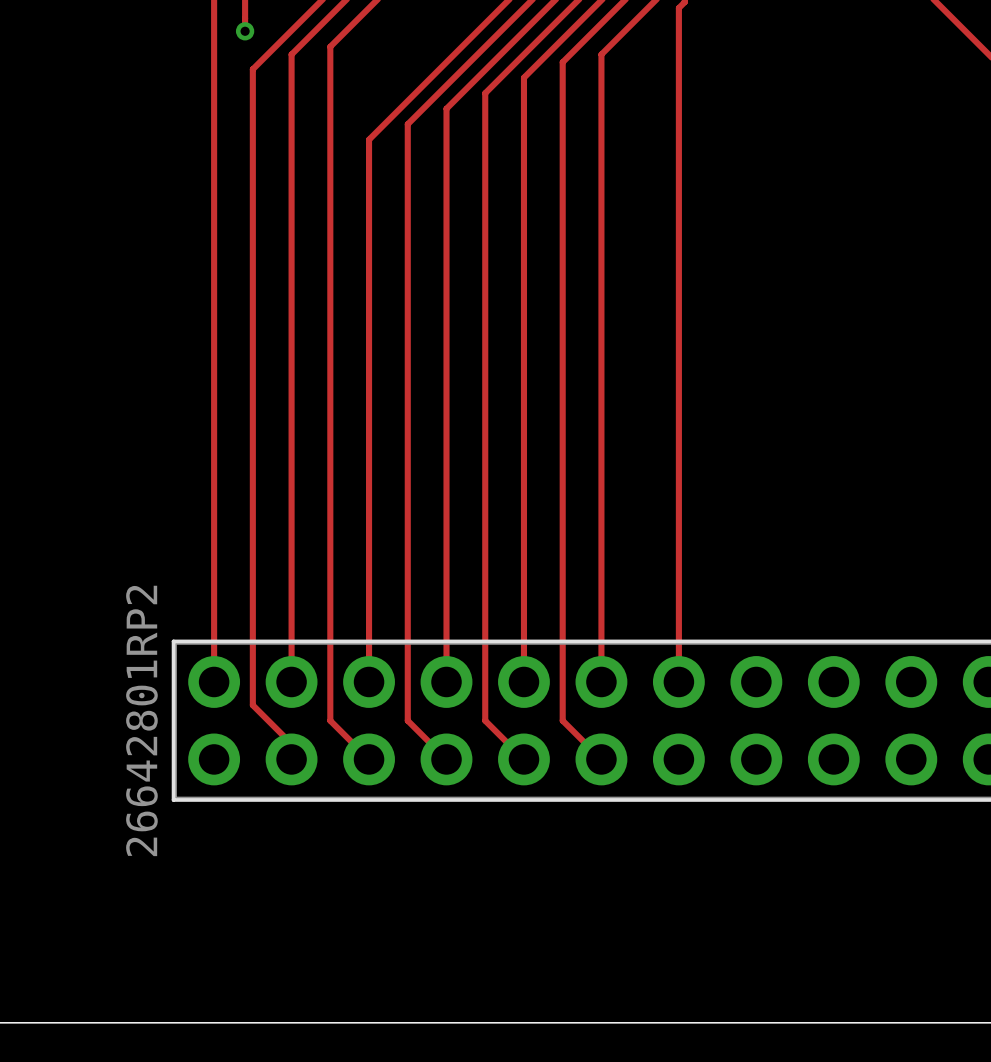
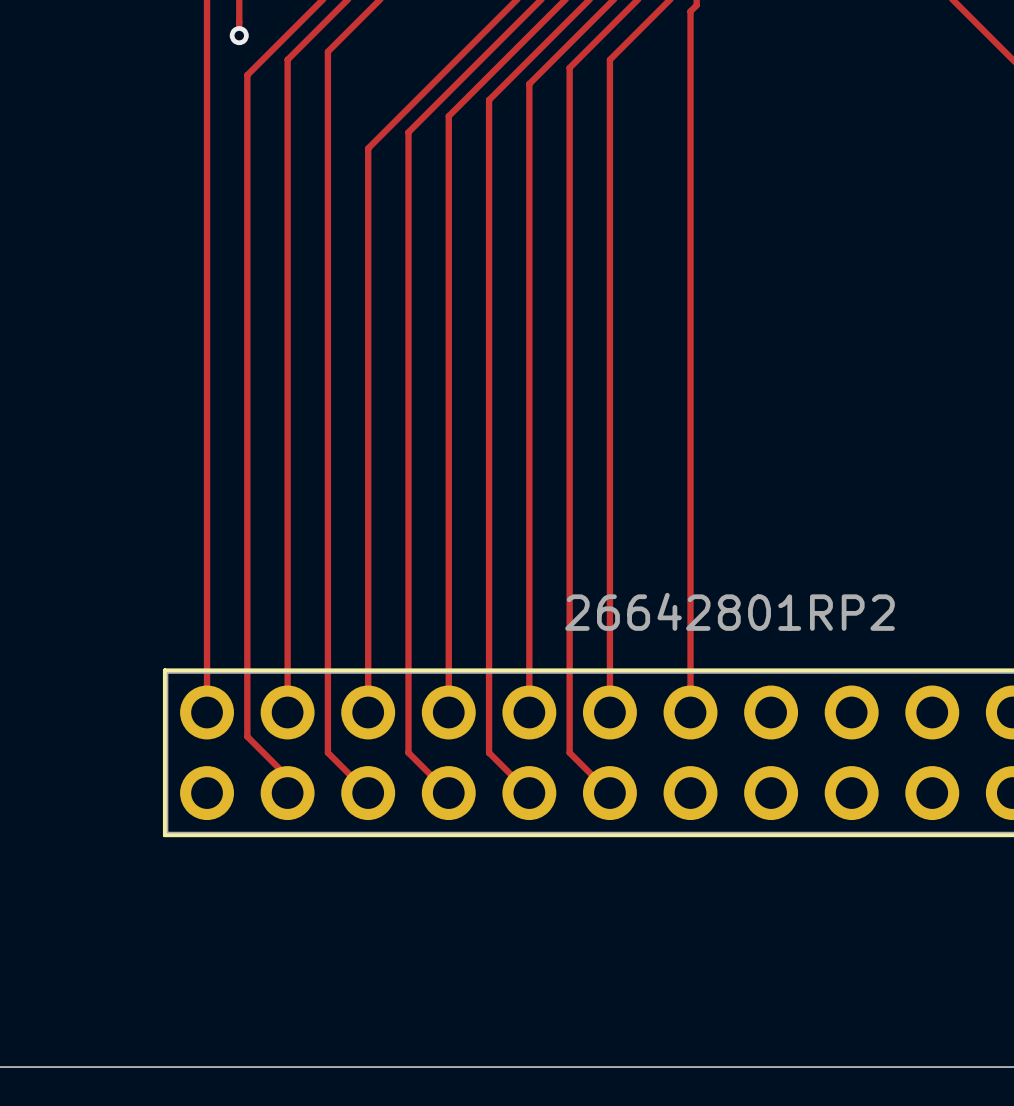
part value rotation: 0° (141, 720) -> 90° clockwise (730, 611)
part value position: 26642801RP2 (141, 720) -> 26642801RP2 (730, 611)

